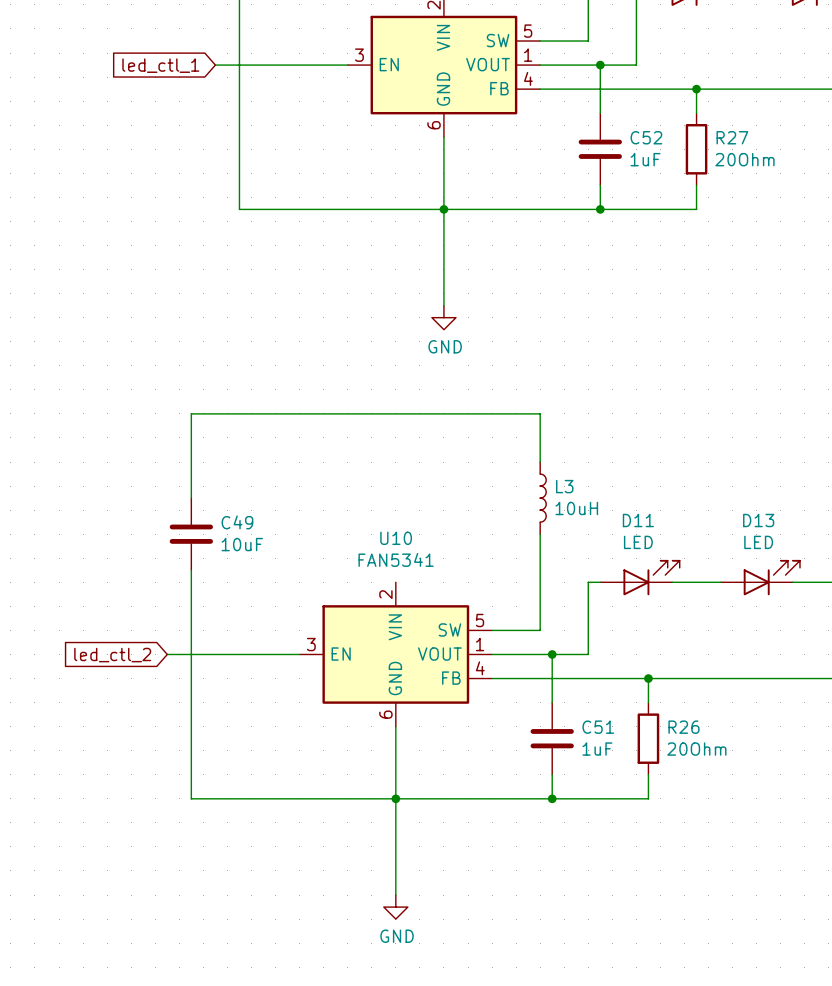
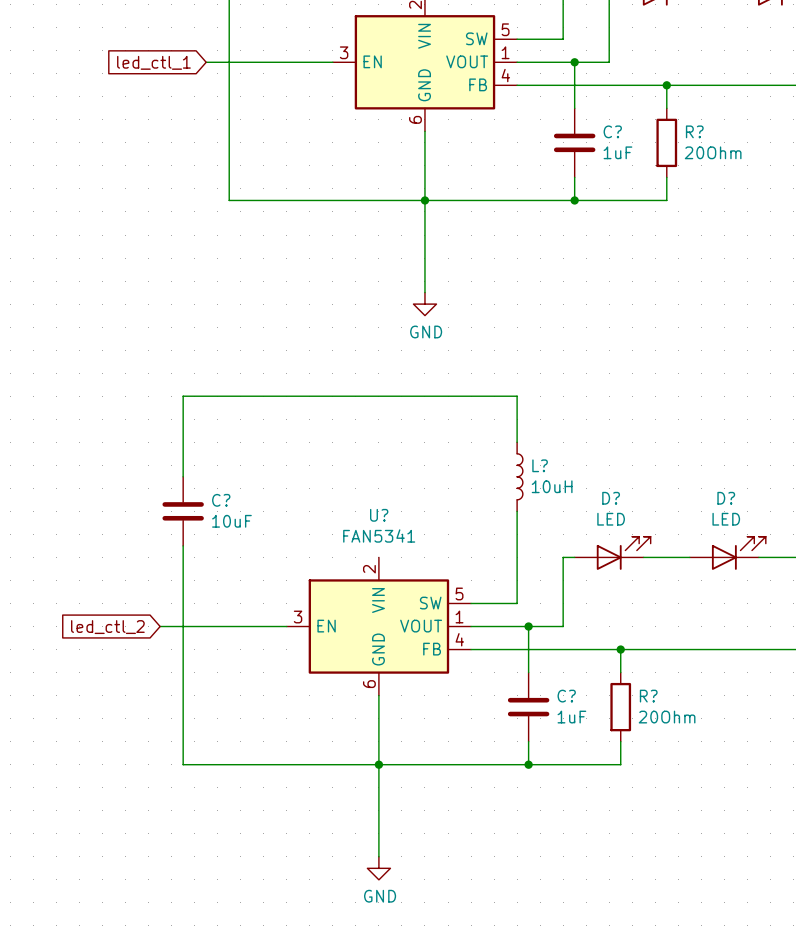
C52 name: C52 (646, 137) -> C? (612, 131)
R27 name: R27 (732, 137) -> R? (694, 131)
L3 name: L3 (564, 486) -> L? (540, 465)
D11 name: D11 (638, 520) -> D? (611, 498)
D13 name: D13 (758, 520) -> D? (726, 498)
C49 name: C49 (237, 522) -> C? (221, 500)
U10 name: U10 (396, 538) -> U? (379, 515)
C51 name: C51 (598, 727) -> C? (566, 696)
R26 name: R26 (683, 727) -> R? (648, 696)

